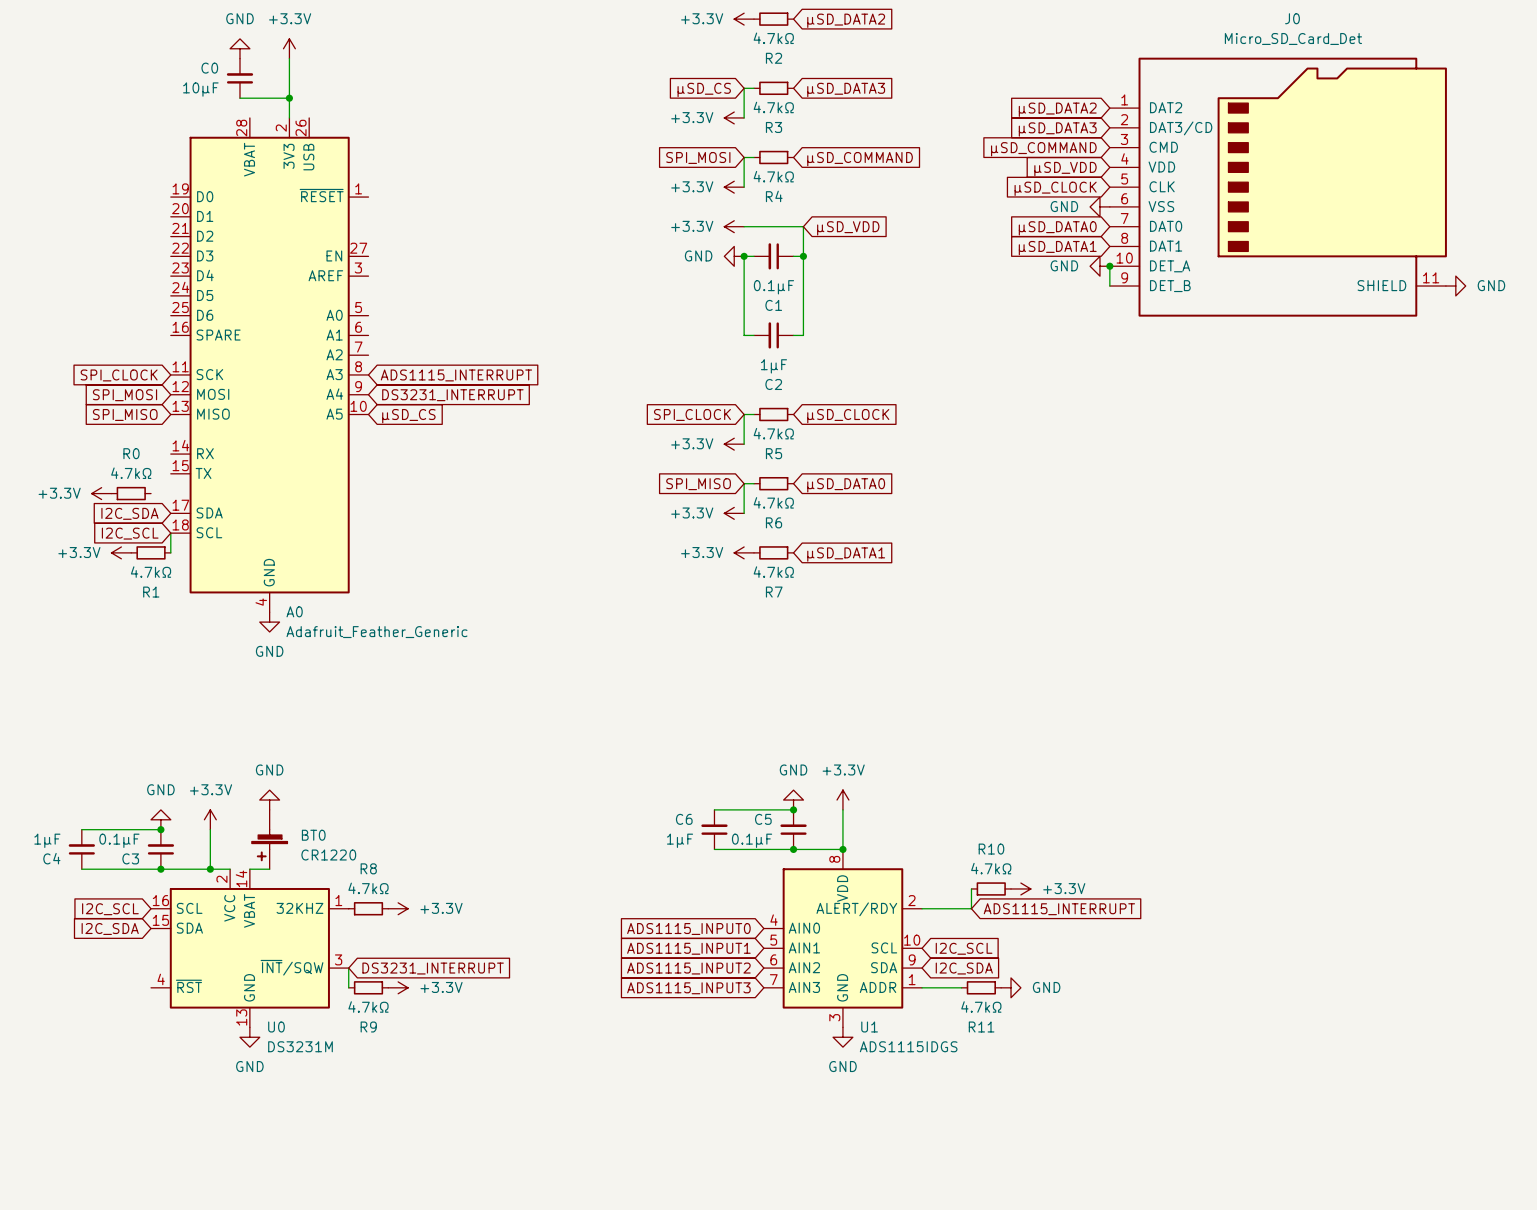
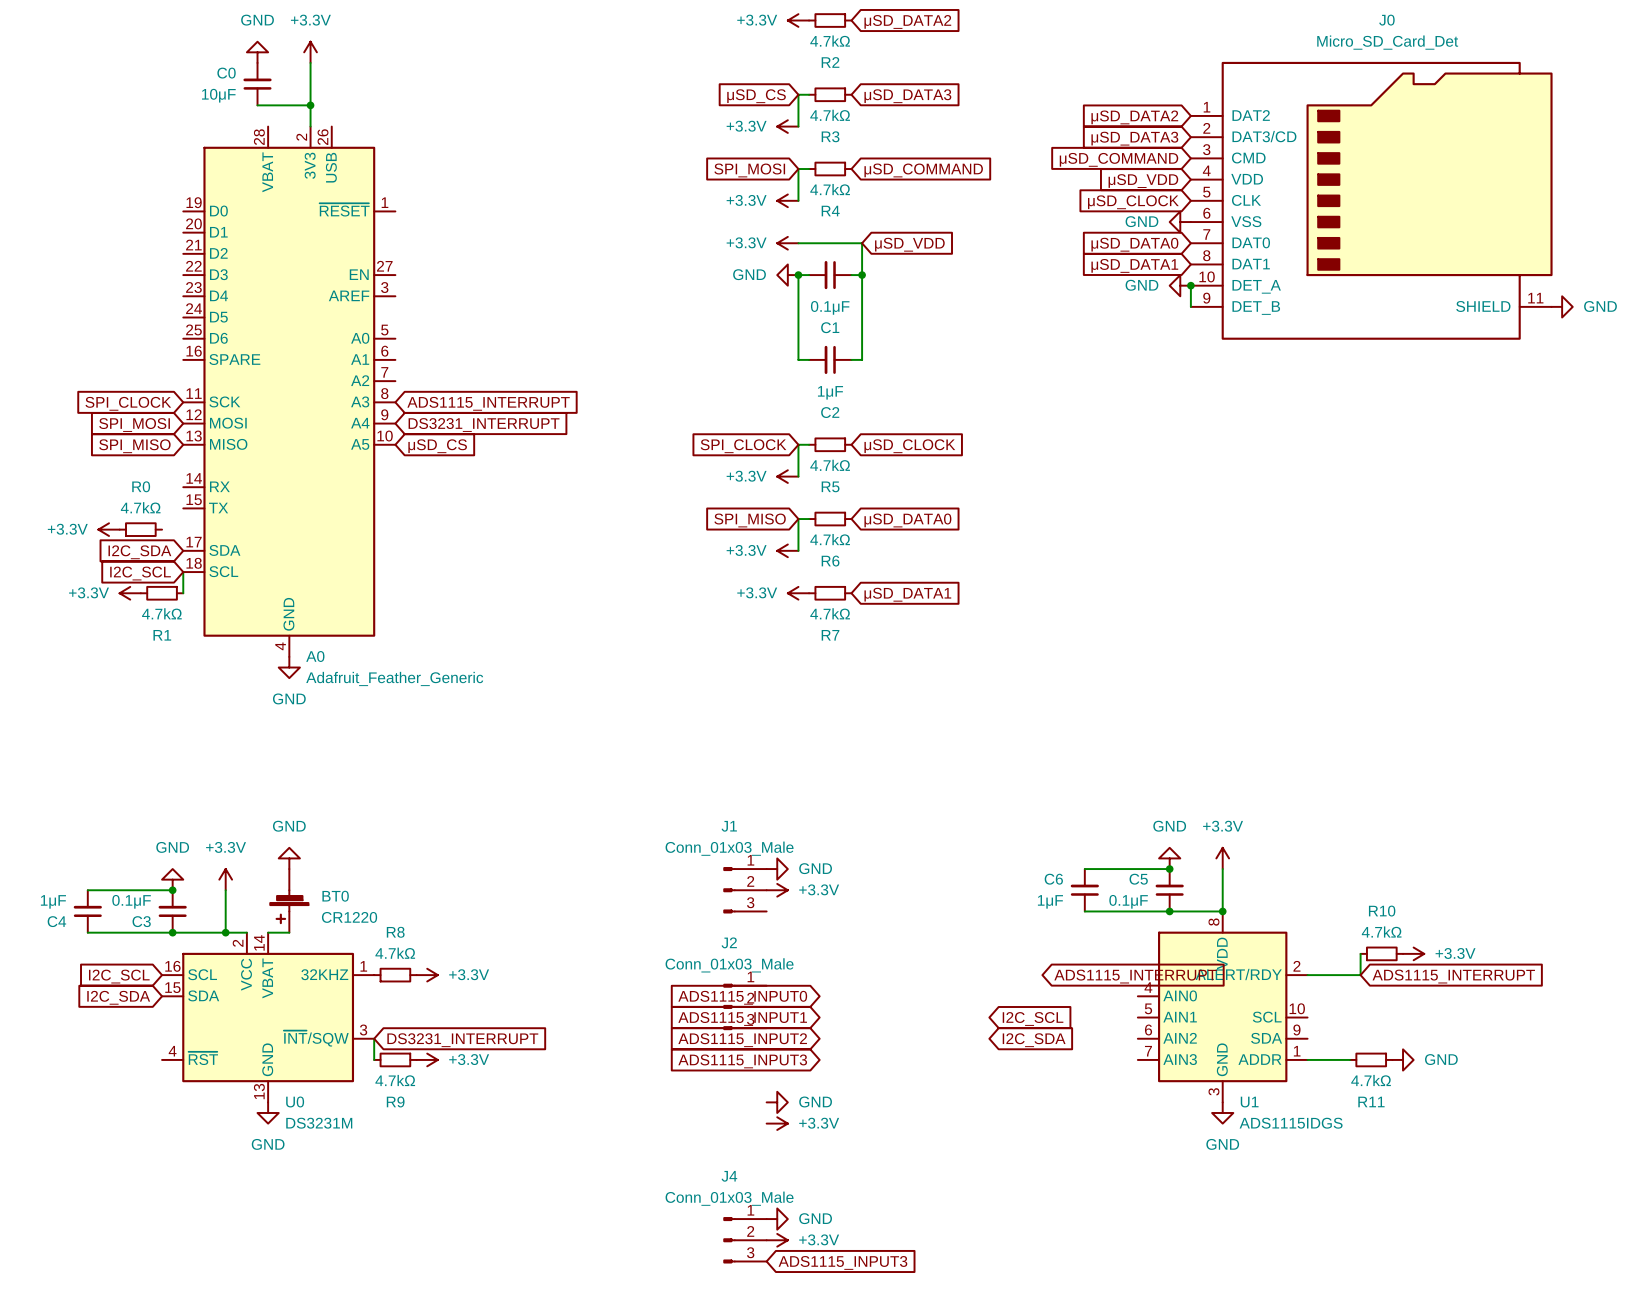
power symbol text position: +3.3V (843, 769) -> +3.3V (819, 889)
power symbol rotation: 0° (793, 800) -> 90° clockwise (777, 869)
power symbol position: GND (793, 800) -> GND (777, 869)
power symbol rotation: 0° (842, 800) -> 90° clockwise (777, 890)
power symbol position: +3.3V (842, 800) -> +3.3V (777, 890)
power symbol: none -> GND (1169, 858)
power symbol: none -> +3.3V (1222, 858)
wire: (714, 809) (793, 809) -> none
junction: (793, 809) -> none
wire: (842, 809) (842, 849) (714, 849) -> none
wire: none -> (1084, 869) (1169, 869)
junction: none -> (1169, 869)
wire: none -> (1222, 869) (1222, 911) (1084, 911)
J1: none -> Conn_01x03_Male (745, 890)
C6 position: (714, 829) -> (1084, 890)
C5 position: (793, 829) -> (1169, 890)
junction: (793, 849) -> none
junction: (842, 849) -> none
junction: none -> (1169, 911)
junction: none -> (1222, 911)
wire: (971, 888) (971, 908) (922, 908) -> none
R10 position: (991, 888) -> (1381, 953)
power symbol: +3.3V (1020, 888) -> none
wire: none -> (1360, 953) (1360, 975) (1307, 975)
power symbol: none -> +3.3V (1413, 953)
global label: none -> ADS1115_INTERRUPT (1453, 976)
J2: none -> Conn_01x03_Male (745, 1006)
U1 position: (842, 938) -> (1222, 1006)
wire: (922, 987) (961, 987) -> none
R11 position: (981, 987) -> (1371, 1059)
power symbol: GND (1011, 987) -> none
wire: none -> (1307, 1059) (1349, 1059)
power symbol: none -> GND (1403, 1059)
power symbol: none -> GND (777, 1102)
power symbol: GND (842, 1037) -> none
power symbol: none -> GND (1222, 1112)
power symbol: none -> +3.3V (777, 1123)
power symbol: none -> GND (777, 1219)
J4: none -> Conn_01x03_Male (745, 1240)
power symbol: none -> +3.3V (777, 1240)
global label: none -> ADS1115_INPUT3 (842, 1262)

